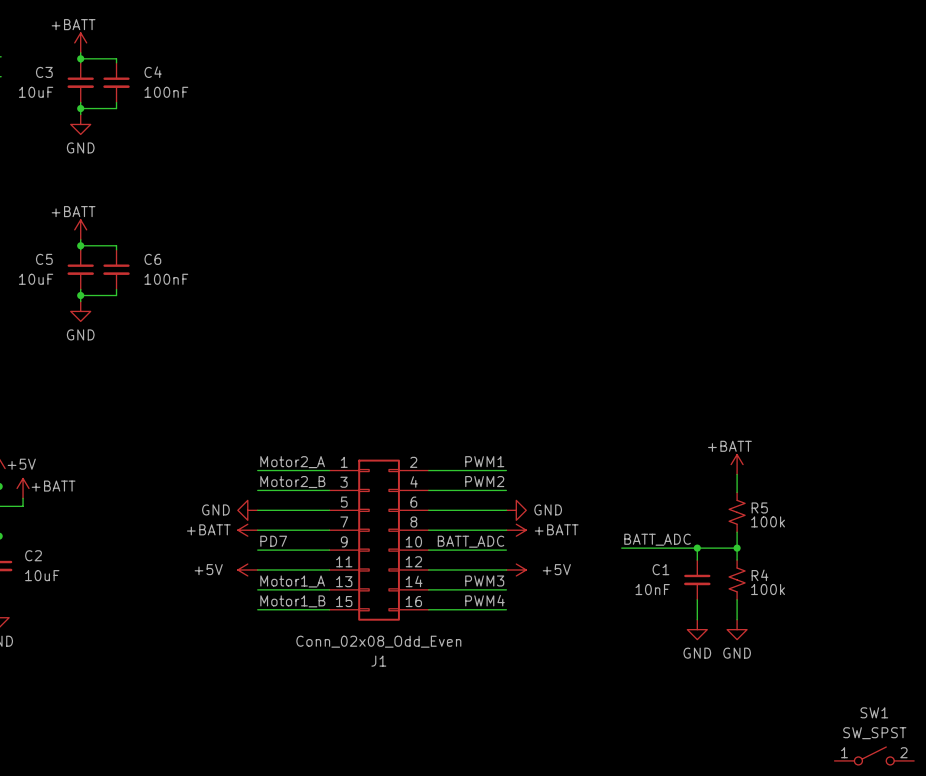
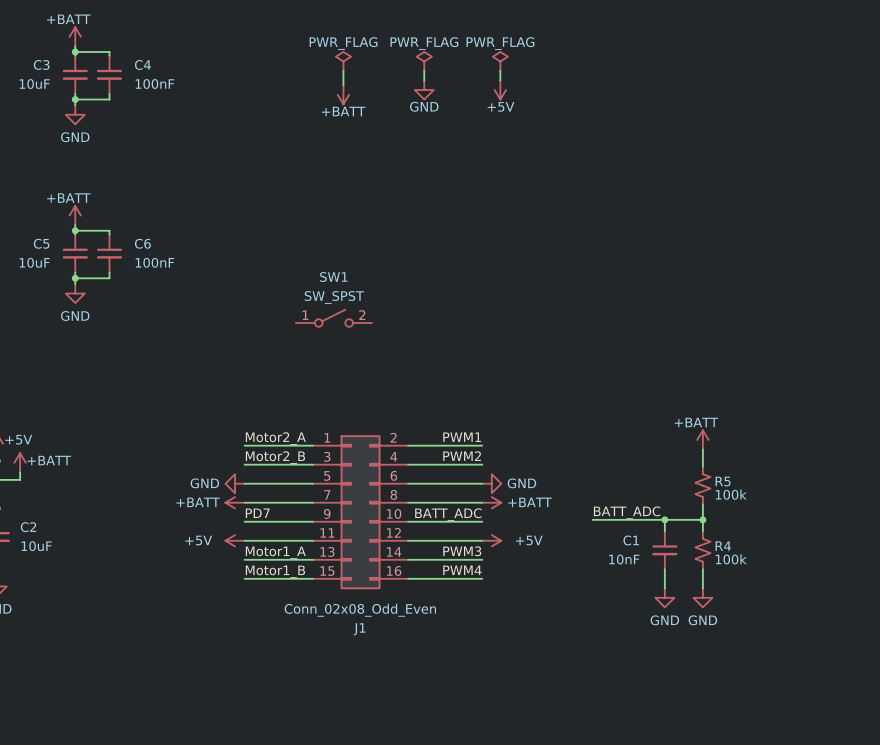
power symbol: none -> PWR_FLAG (343, 61)
power symbol: none -> PWR_FLAG (424, 61)
power symbol: none -> PWR_FLAG (500, 61)
wire: none -> (343, 71) (343, 85)
wire: none -> (424, 71) (424, 80)
wire: none -> (500, 71) (500, 80)
power symbol: none -> GND (424, 90)
power symbol: none -> +5V (500, 90)
power symbol: none -> +BATT (343, 94)
SW1 position: (874, 755) -> (333, 318)

